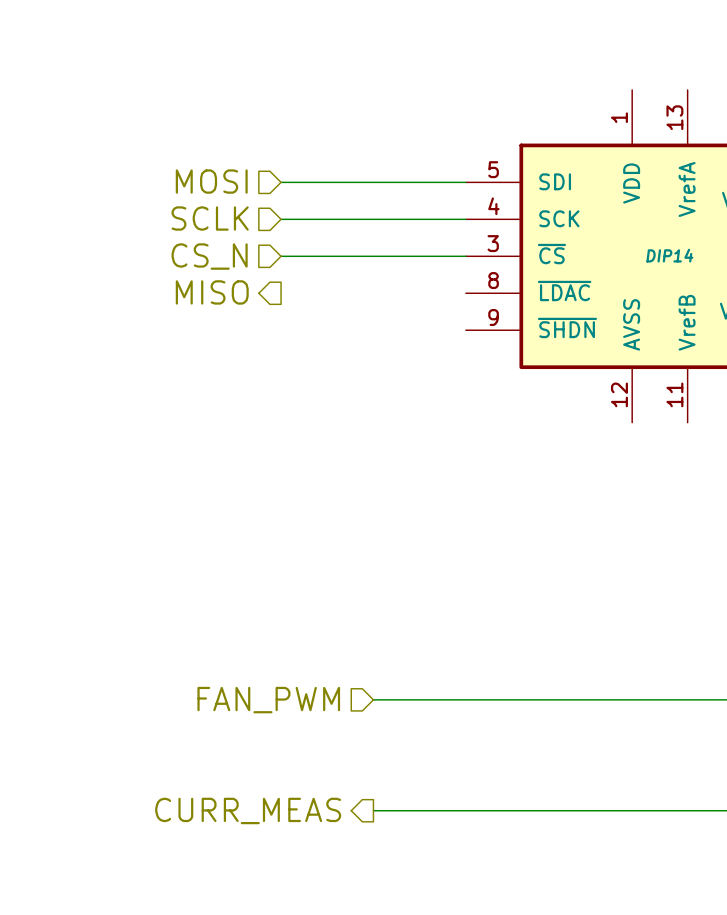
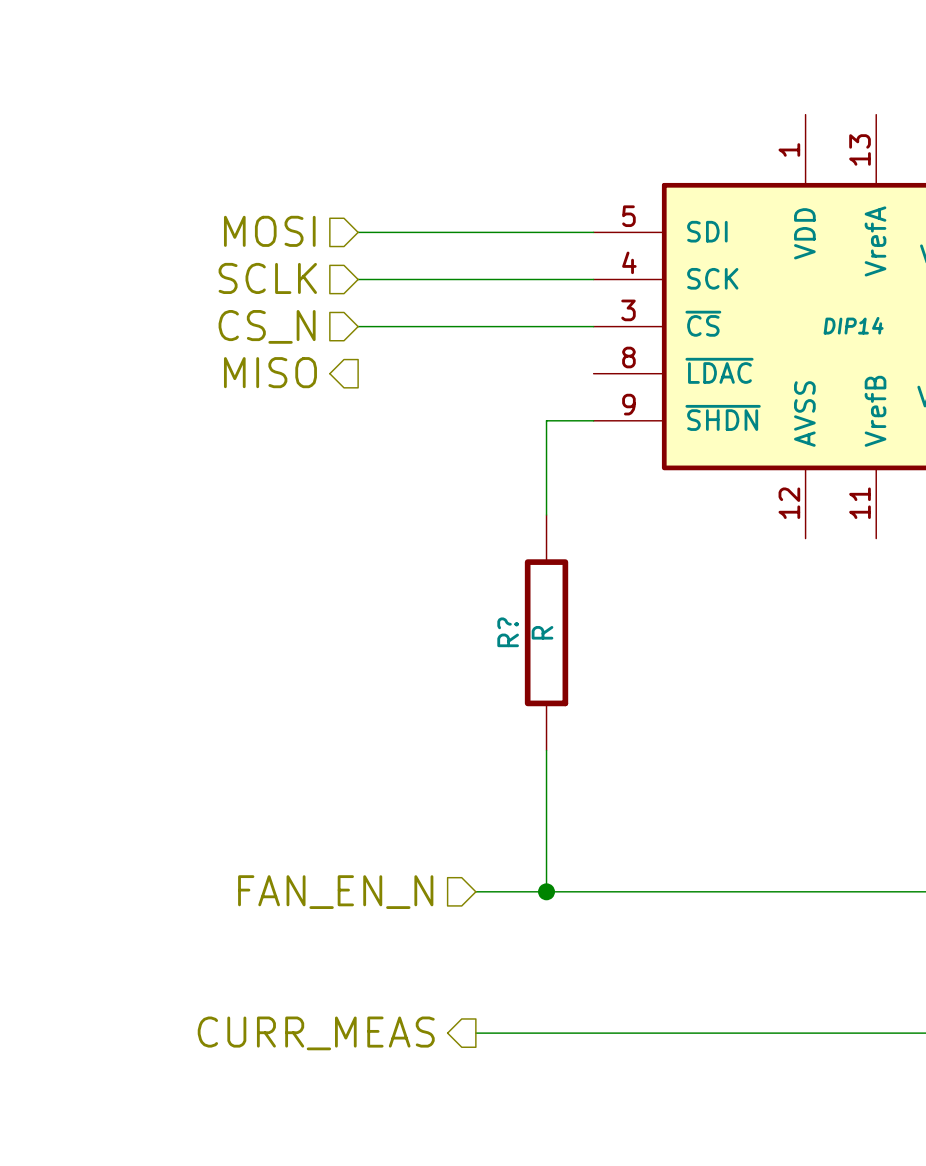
wire: none -> (593, 420) (546, 420) (546, 515)
R?: none -> R (546, 632)
wire: none -> (546, 750) (546, 891)
junction: none -> (546, 891)
hierarchical label: FAN_PWM (268, 700) -> FAN_EN_N (335, 892)

